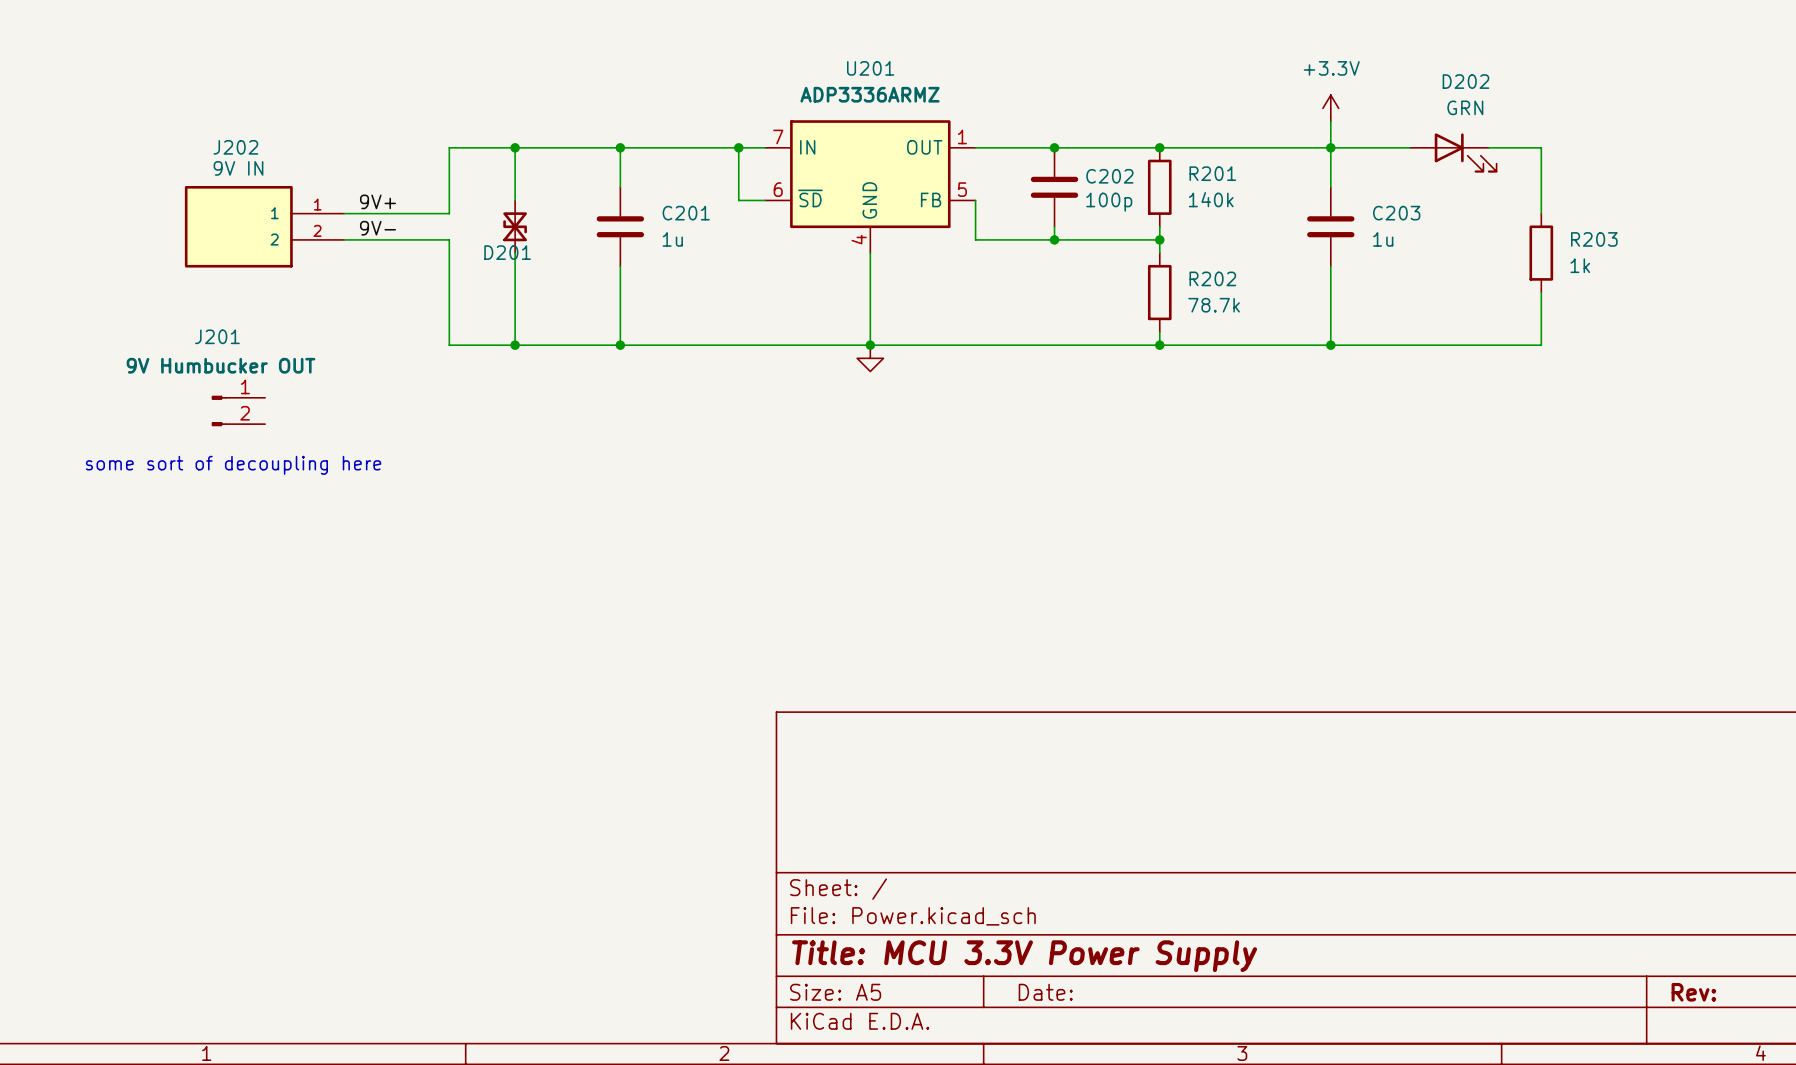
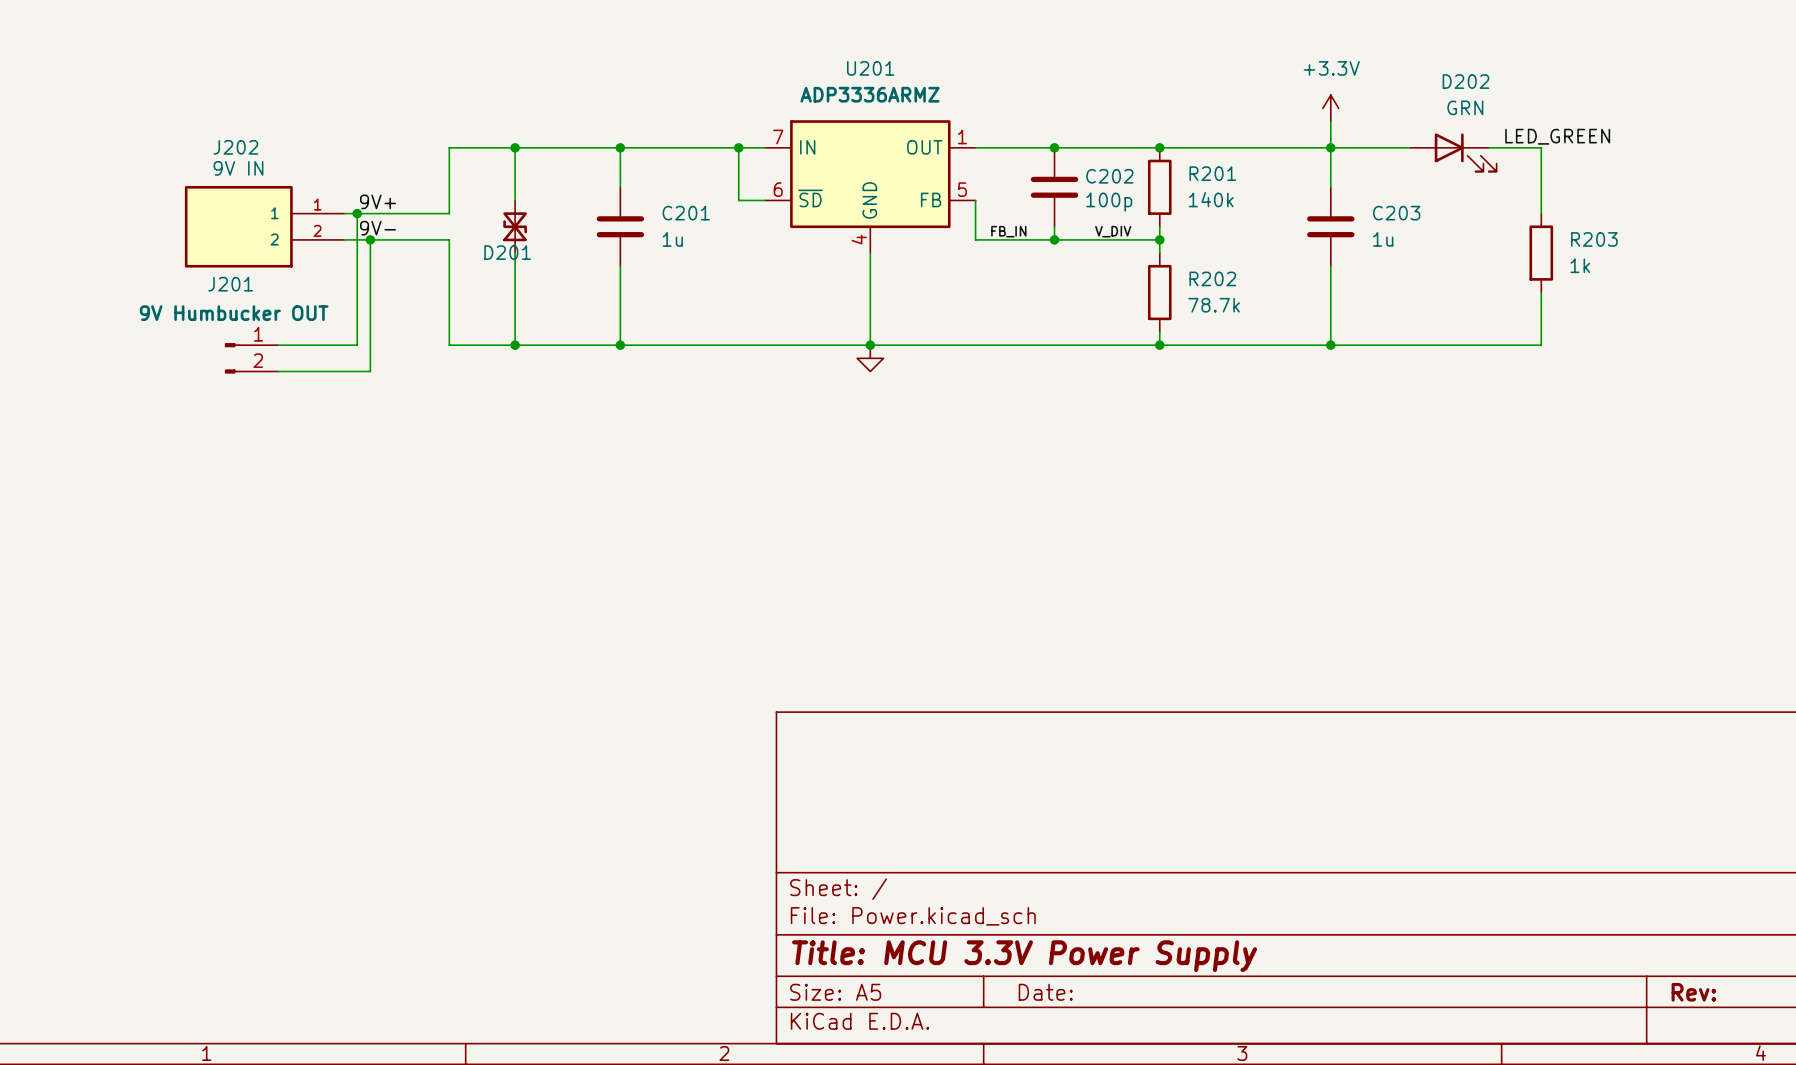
label: none -> LED_GREEN (1557, 136)
wire: none -> (357, 213) (357, 345) (278, 345)
junction: none -> (357, 213)
label: none -> FB_IN (1008, 231)
label: none -> V_DIV (1113, 231)
wire: none -> (370, 239) (370, 371) (278, 371)
junction: none -> (370, 239)
J201 position: (238, 410) -> (251, 358)
text: some sort of decoupling here (233, 465) -> none

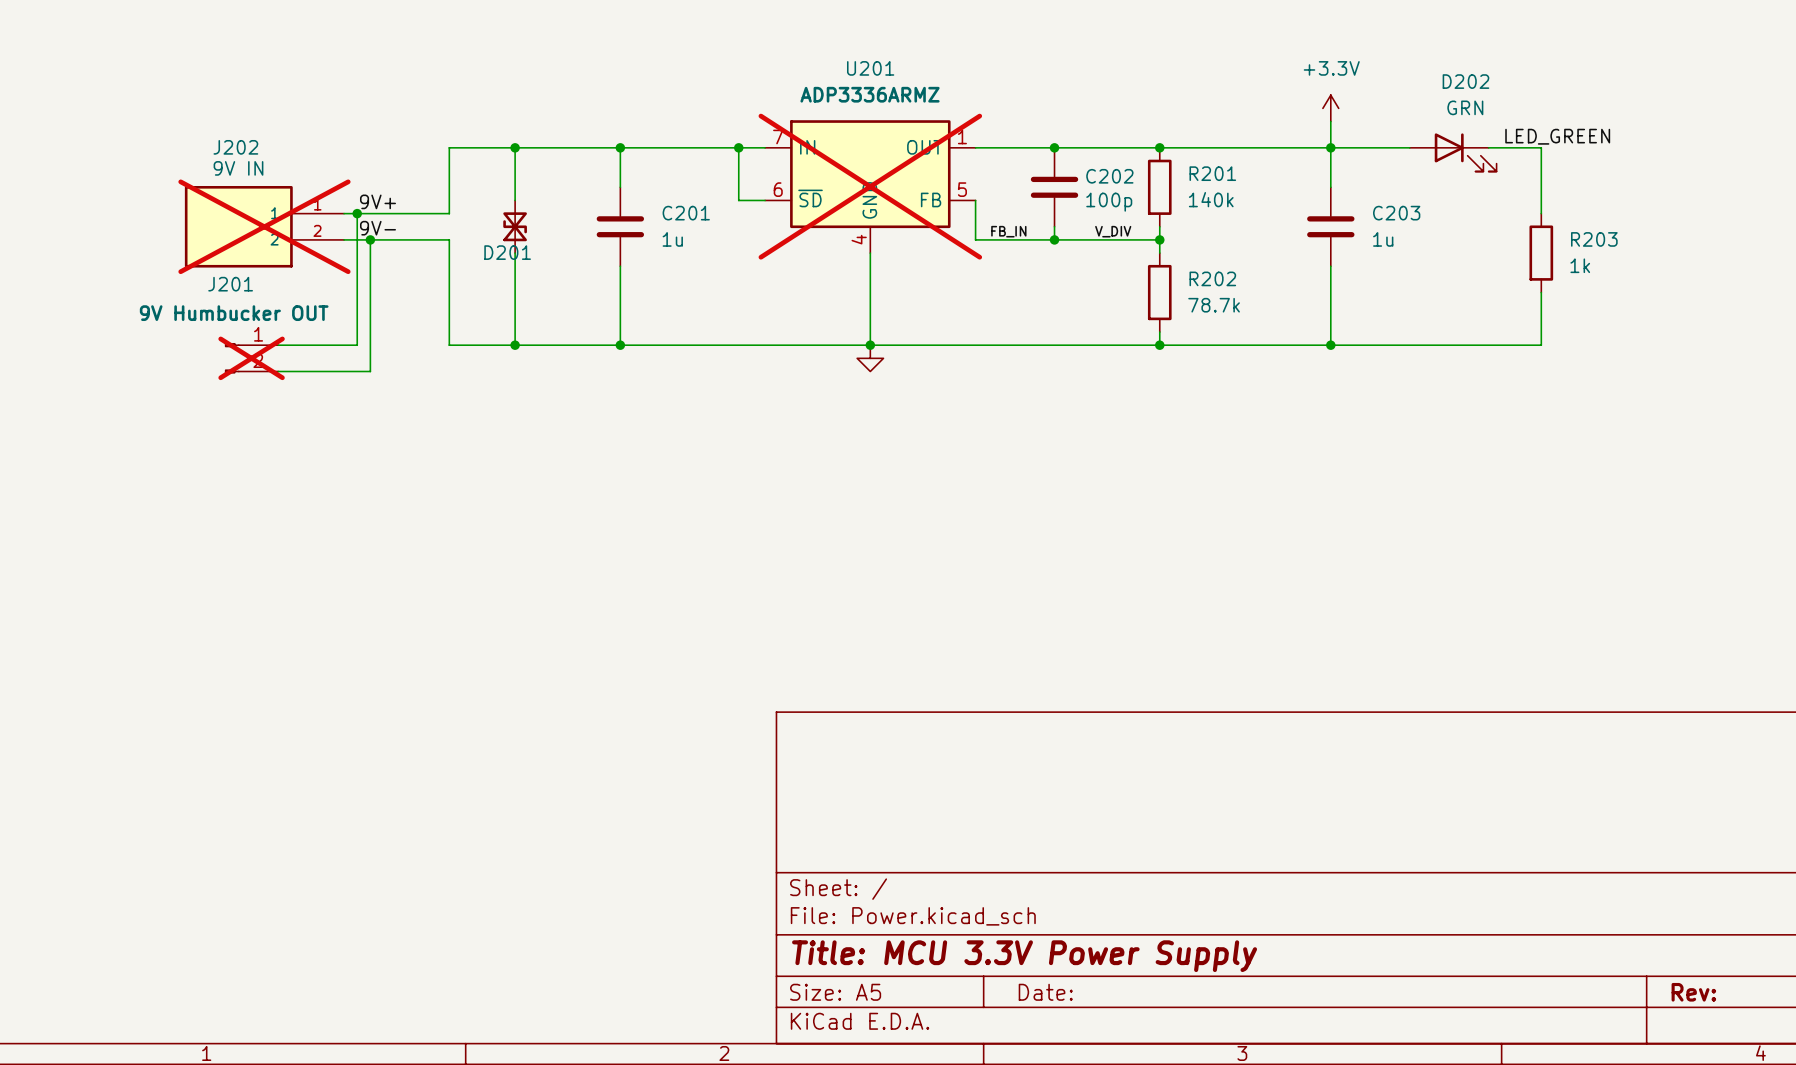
U201 do-not-place cross: none -> (870, 186)
J202 do-not-place cross: none -> (264, 226)
J201 do-not-place cross: none -> (251, 358)

